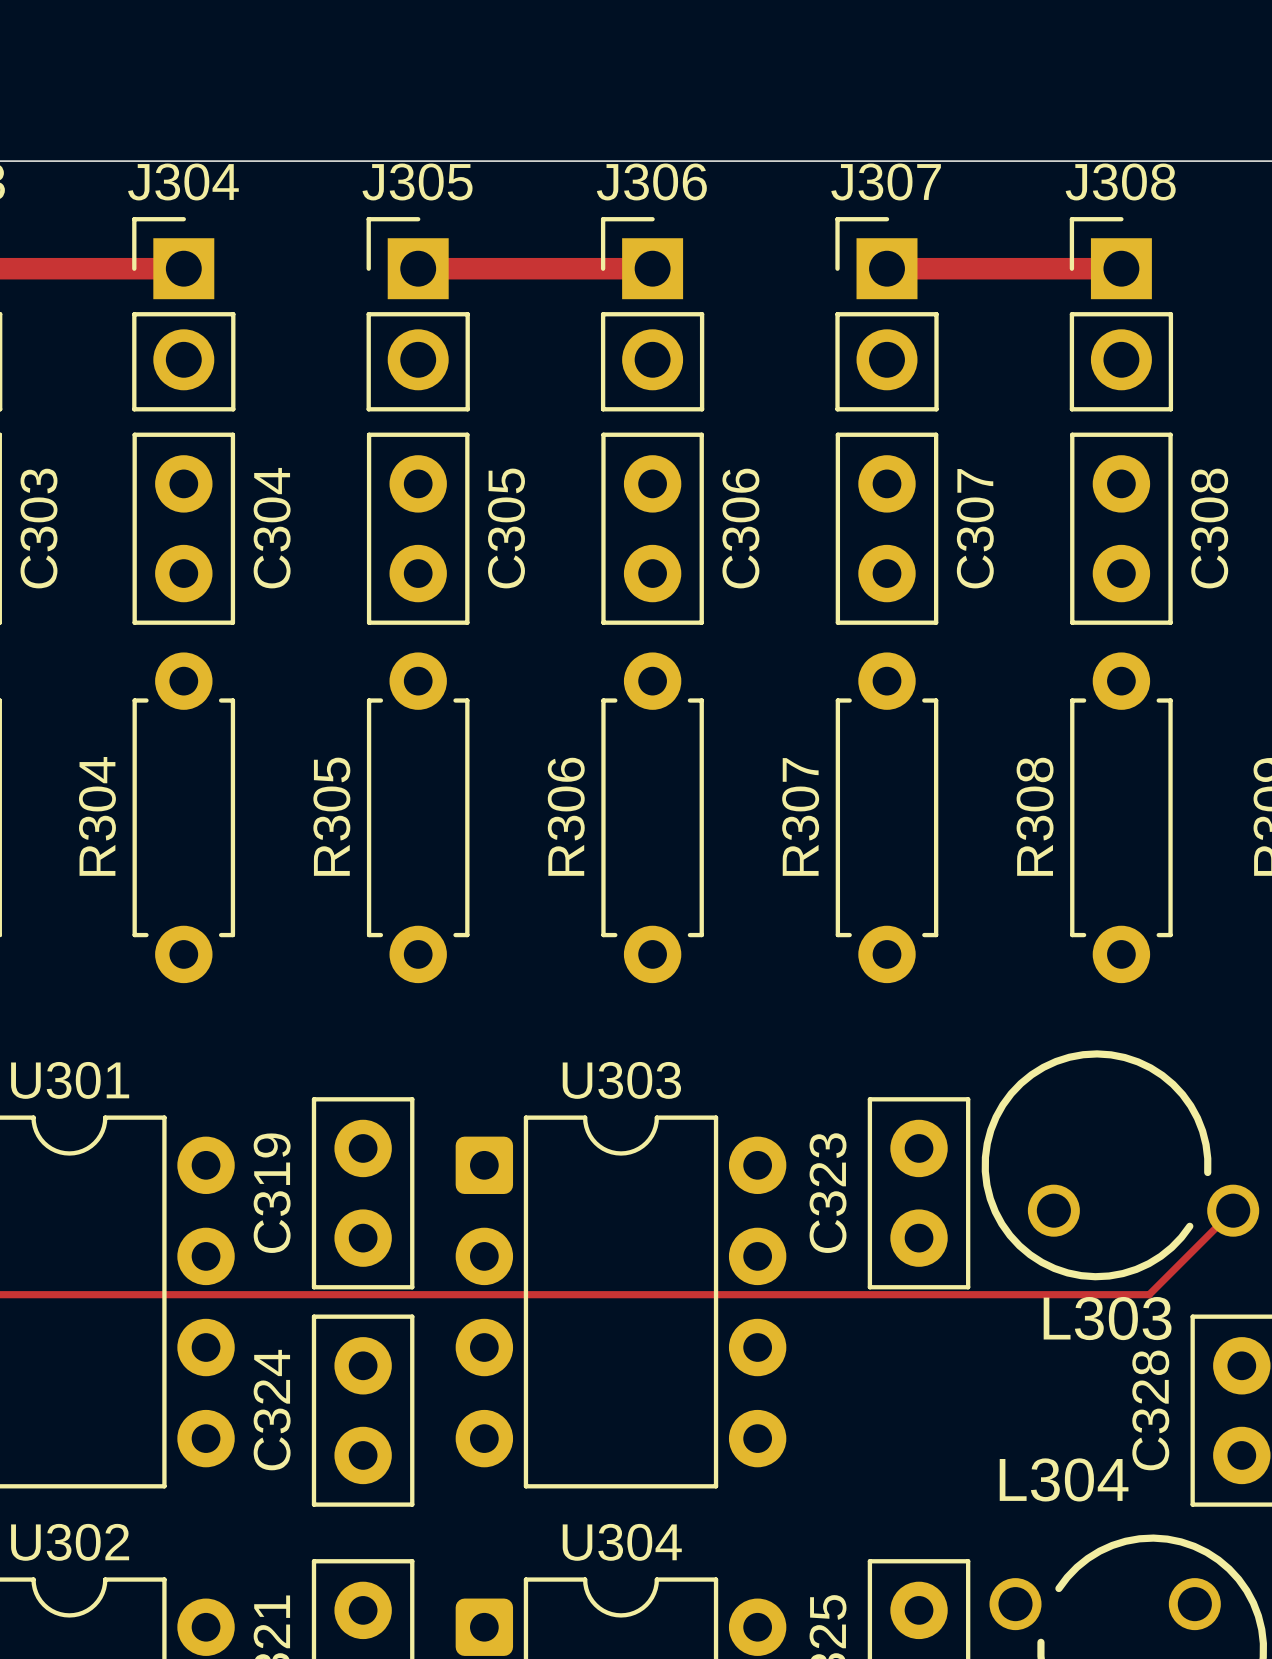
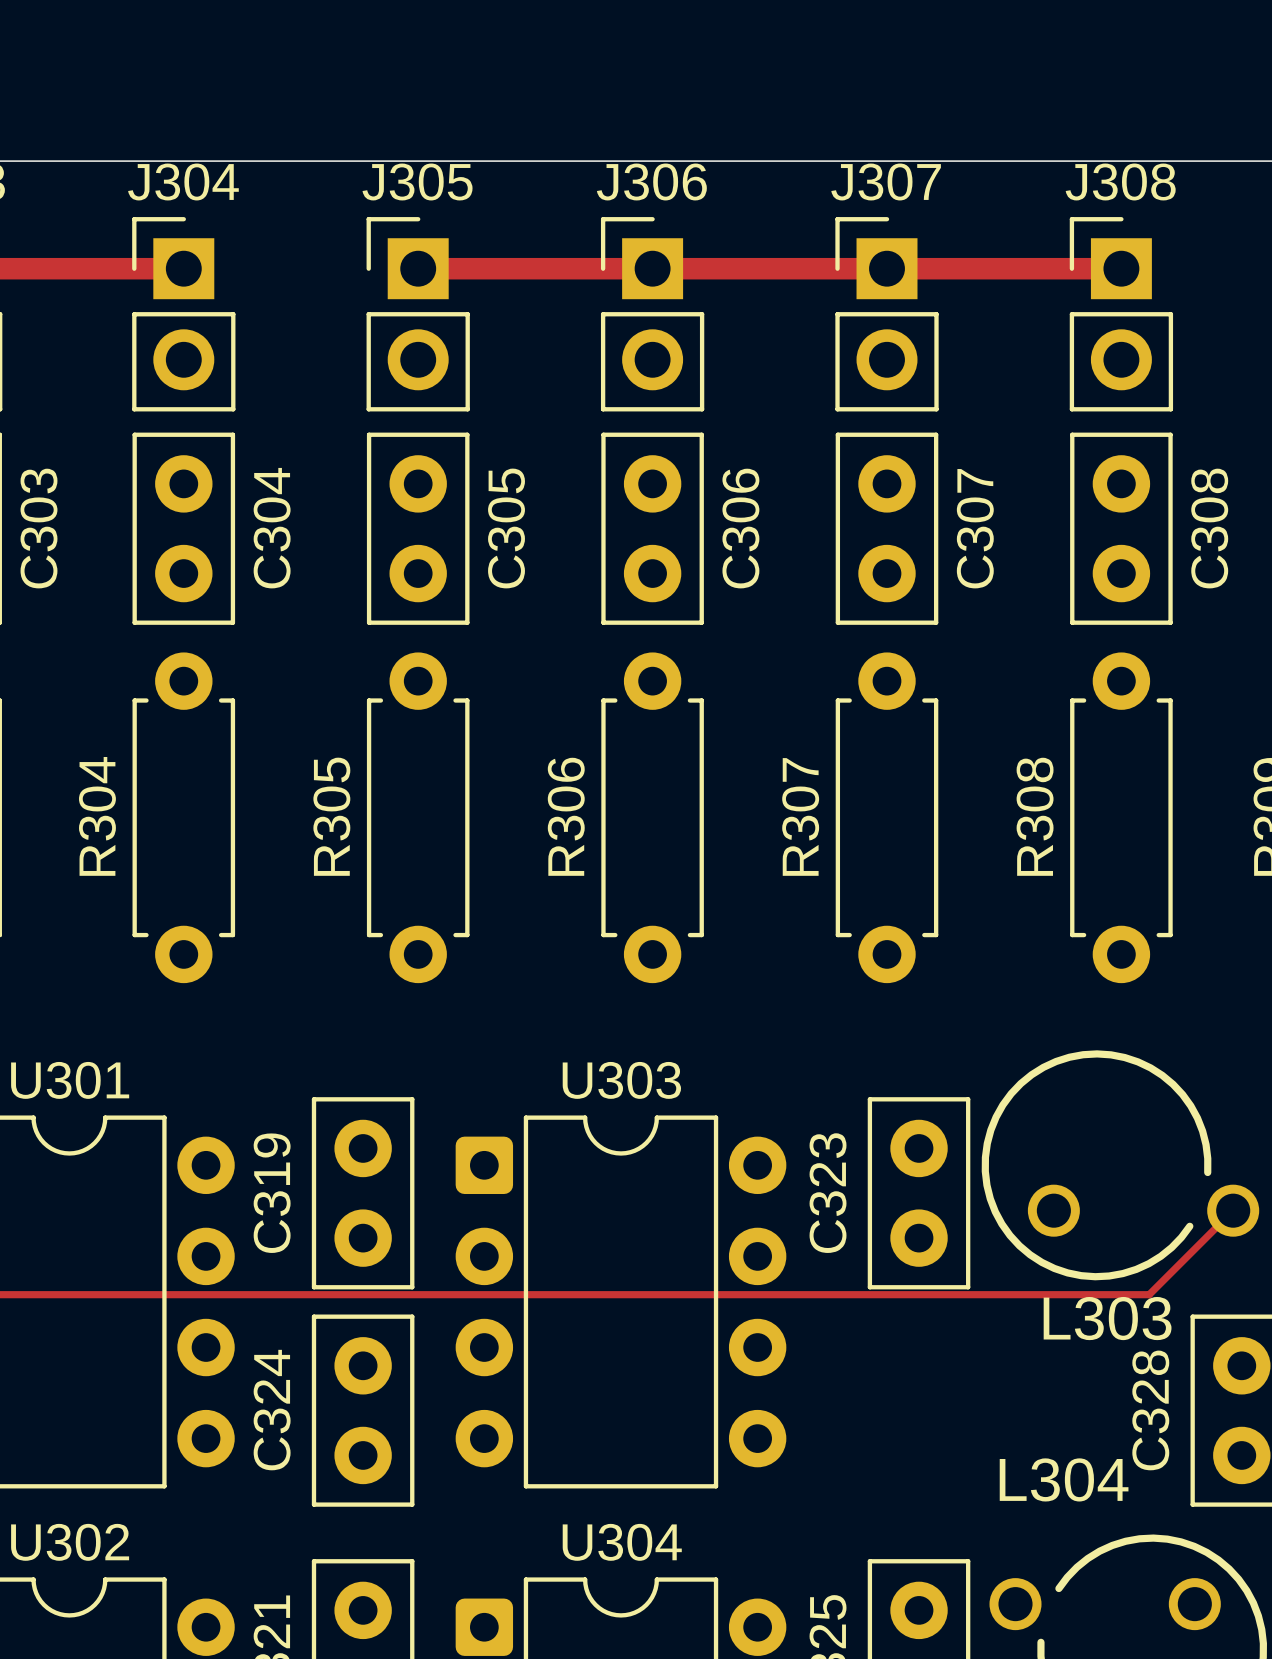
track: none -> (652, 268) (887, 268)

